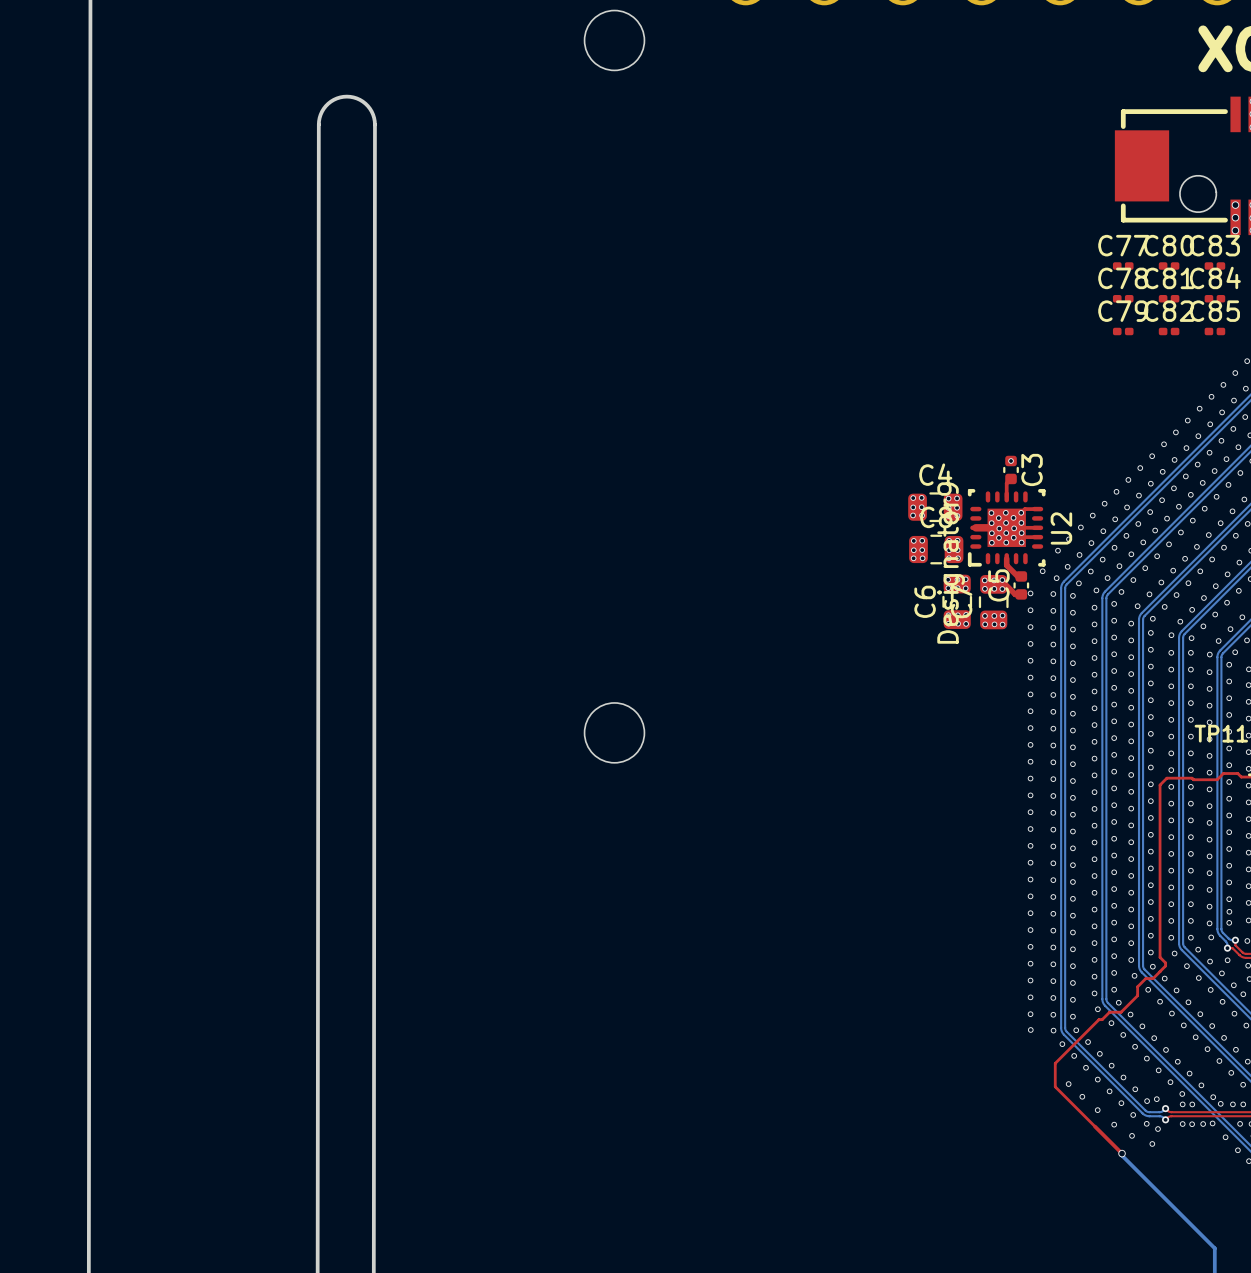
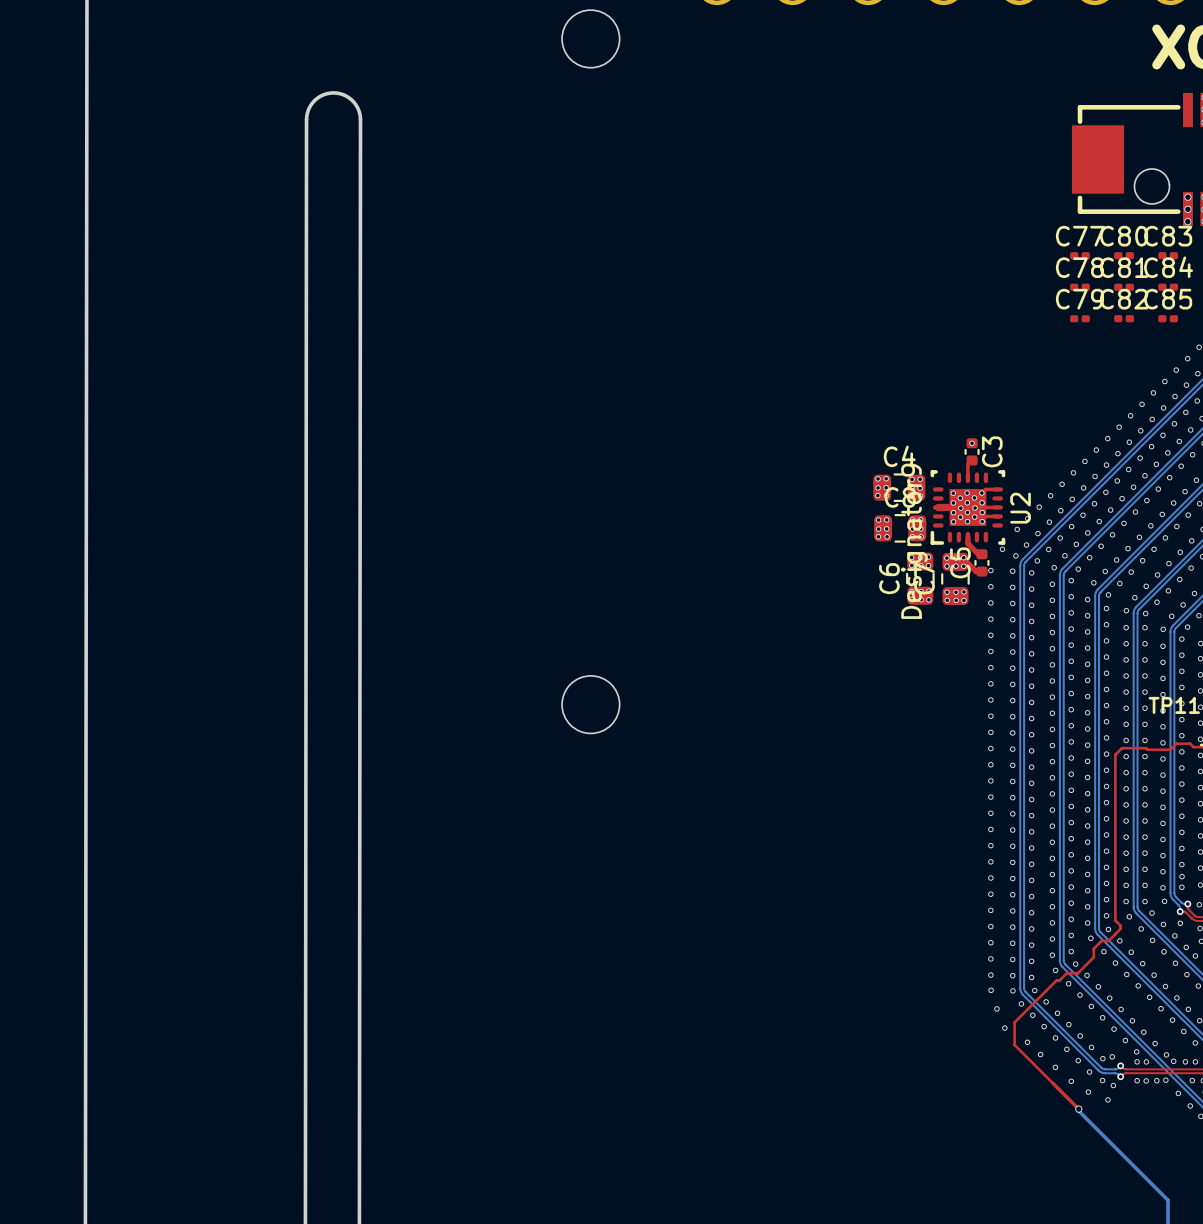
via: none -> (996, 1008)
via: none -> (1004, 1028)

